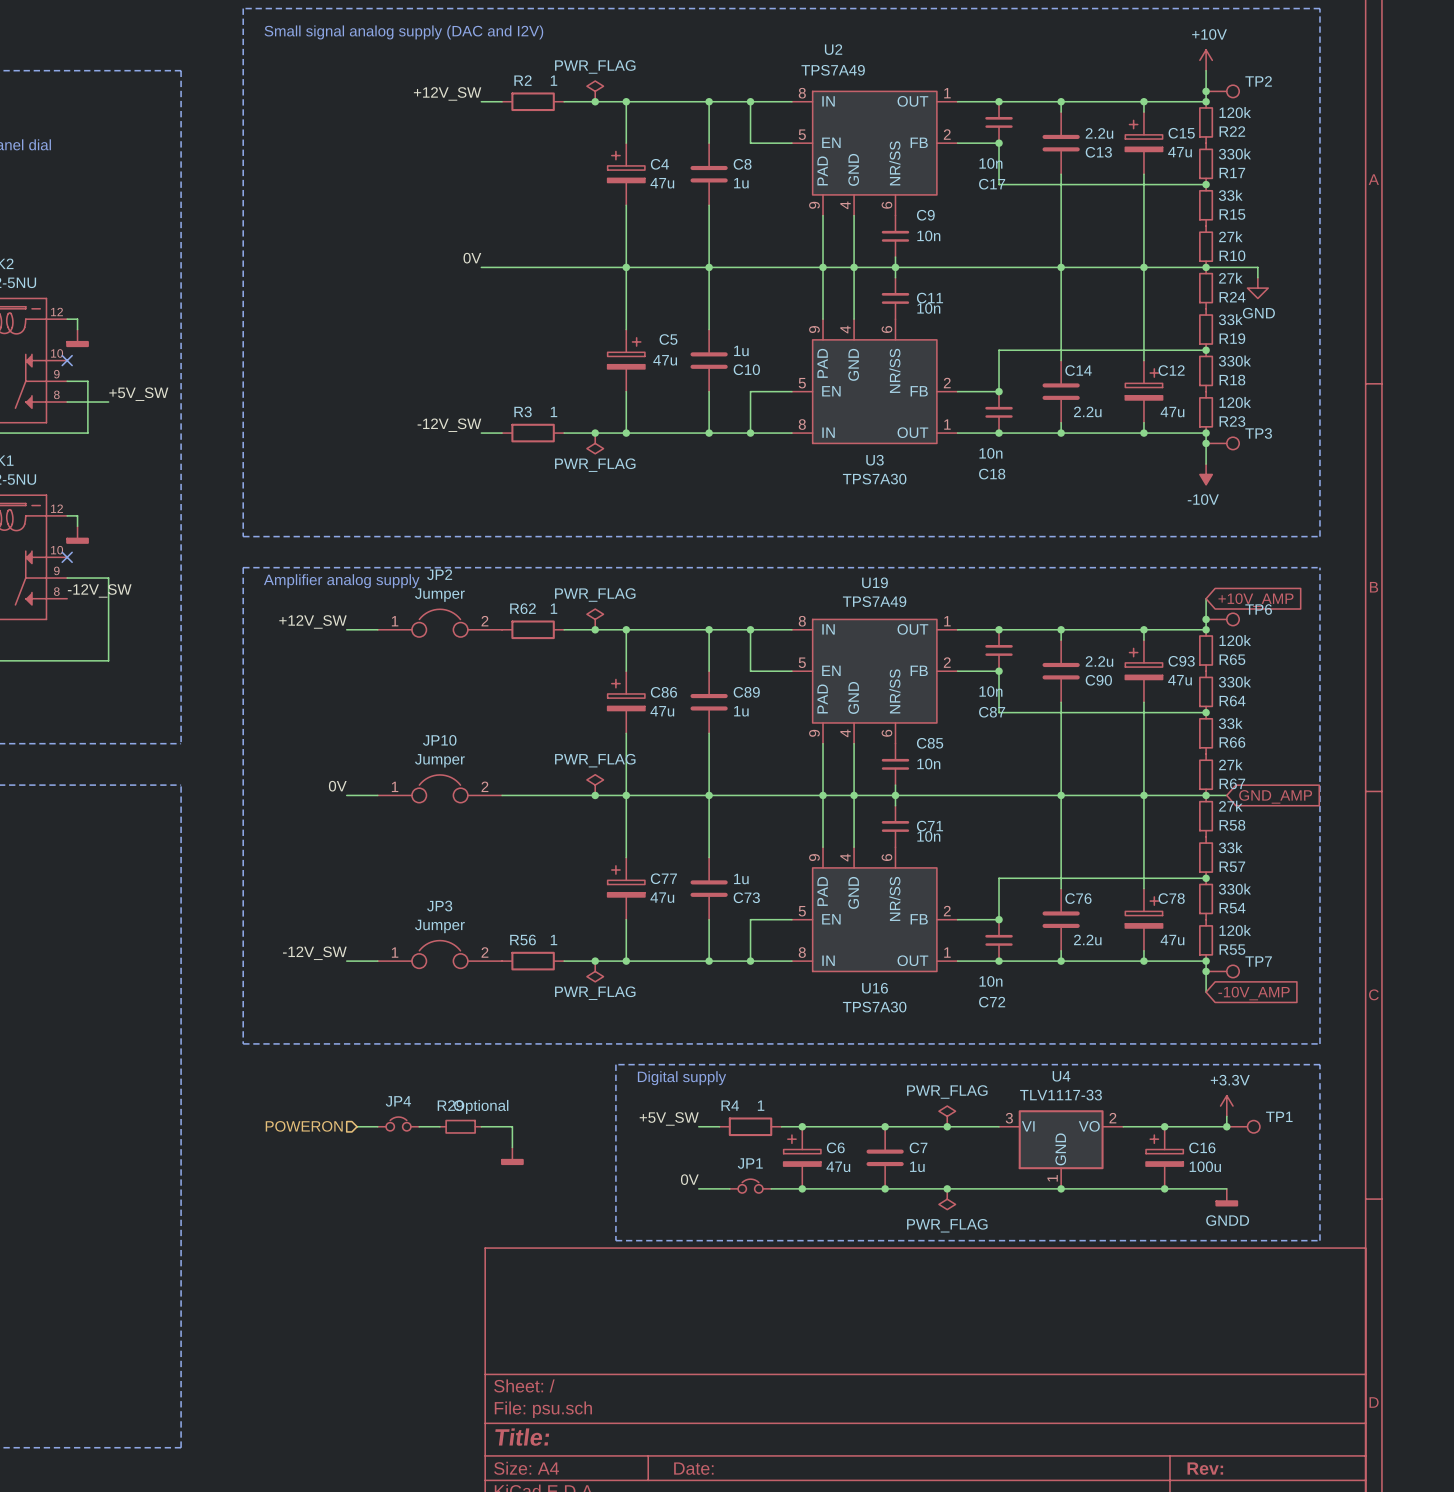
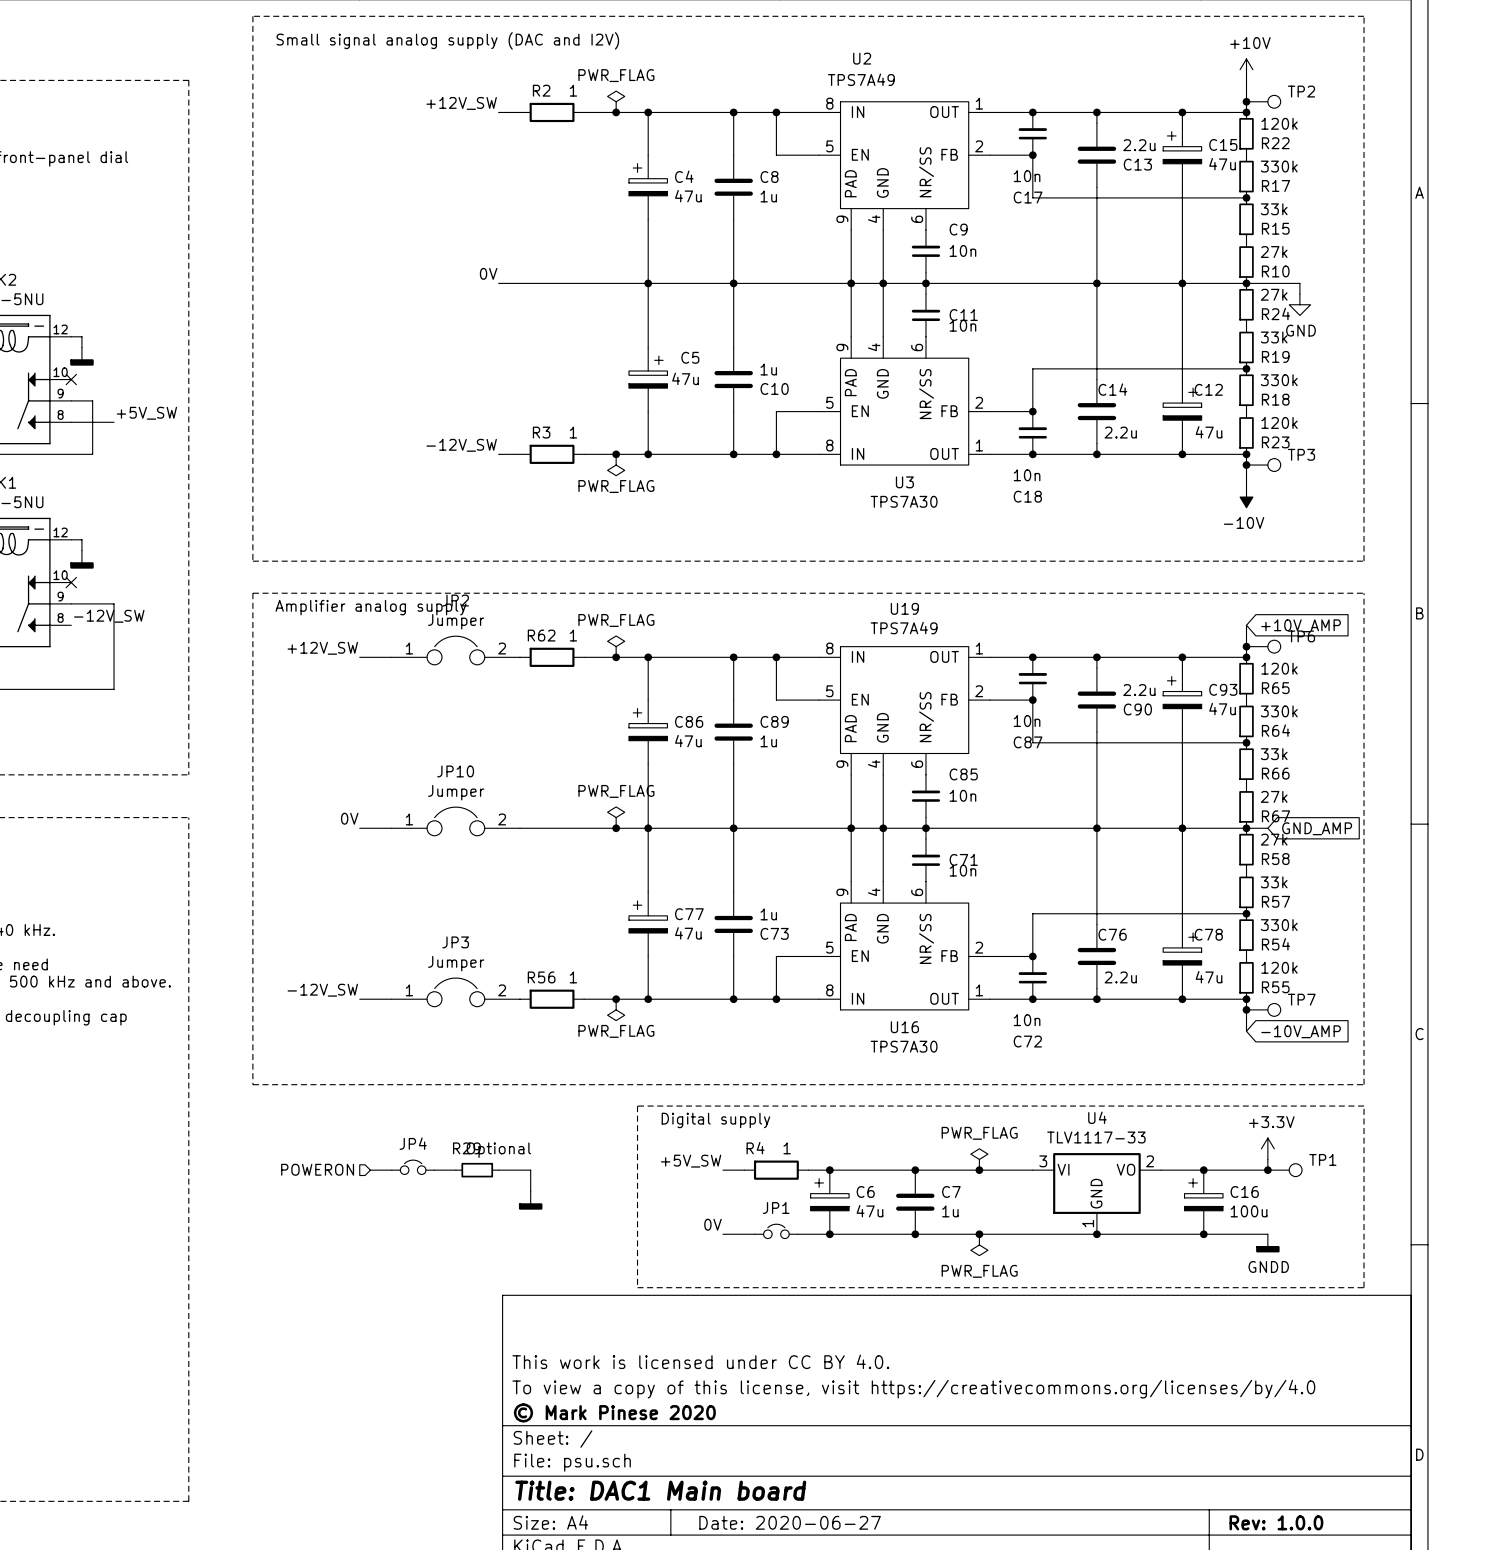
title block: none -> This work is licensed under CC BY 4.0. (700, 1361)
title block: none -> To view a copy of this license, visit https://creativecommons.org/licenses/by/4.0 (913, 1389)
title block: none -> © Mark Pinese 2020 (614, 1412)
title block: Title: (522, 1437) -> Title: DAC1 Main board (660, 1490)
title block: Date: (693, 1468) -> Date: 2020-06-27 (790, 1522)
title block: Rev: (1205, 1468) -> Rev: 1.0.0 (1276, 1522)

